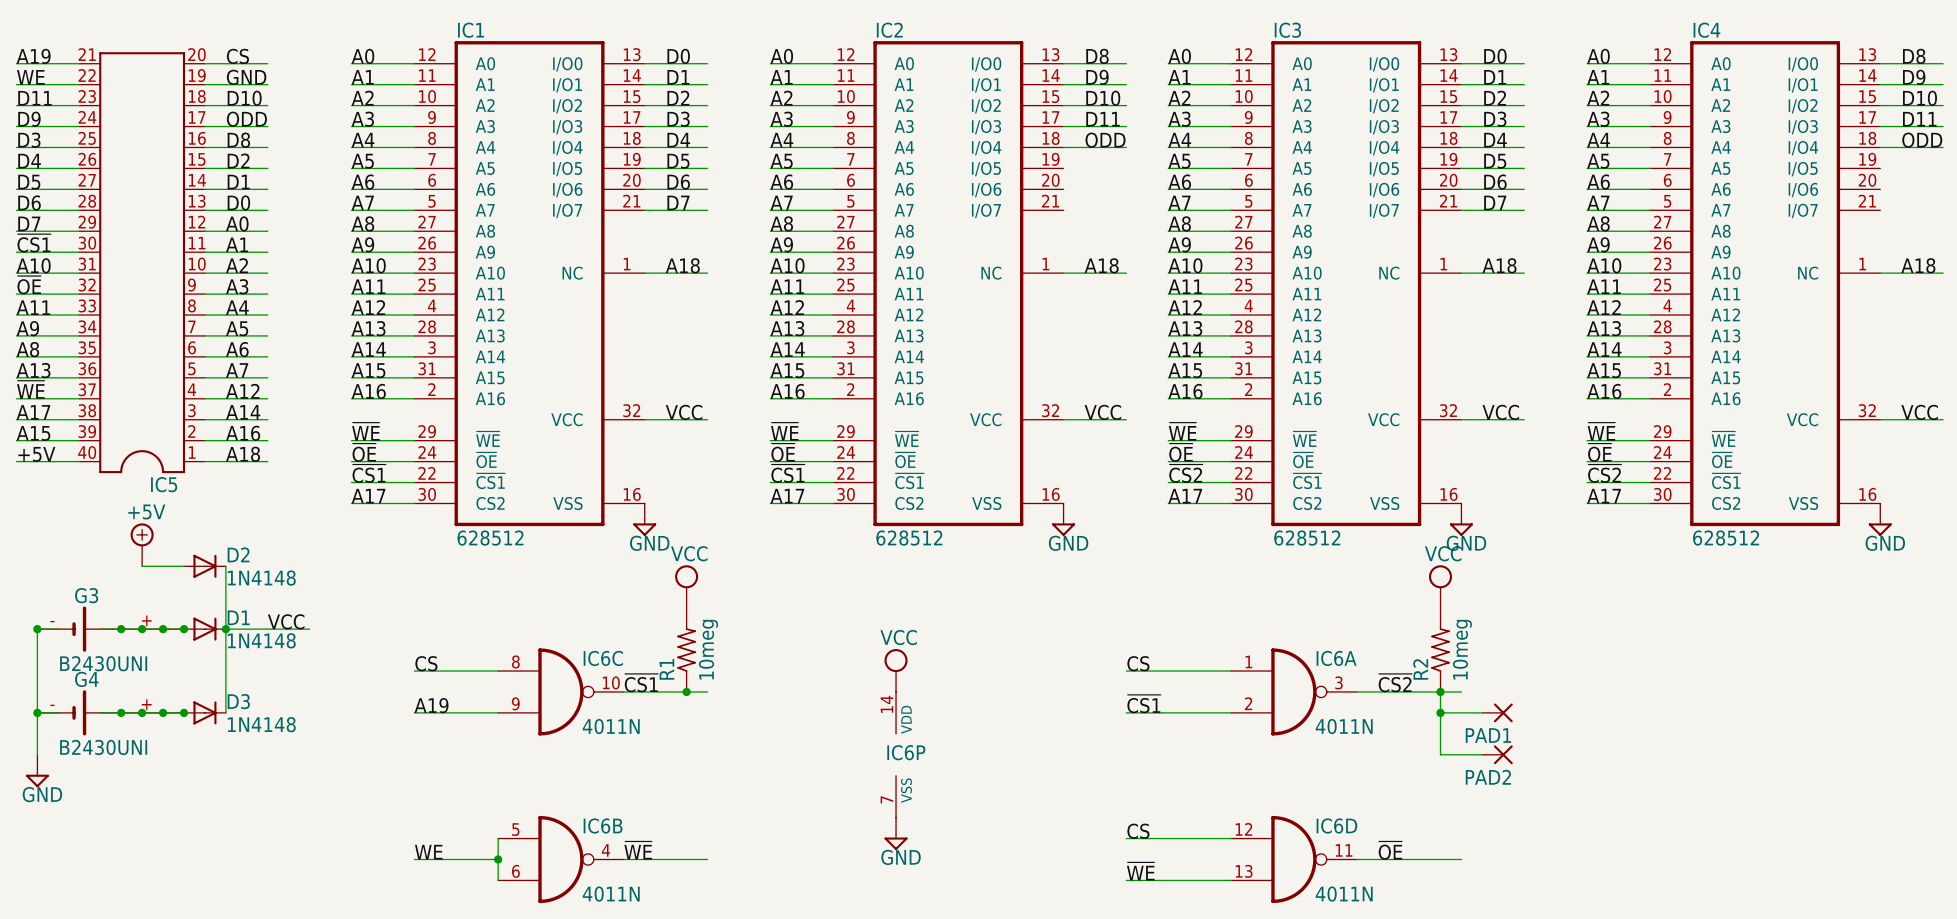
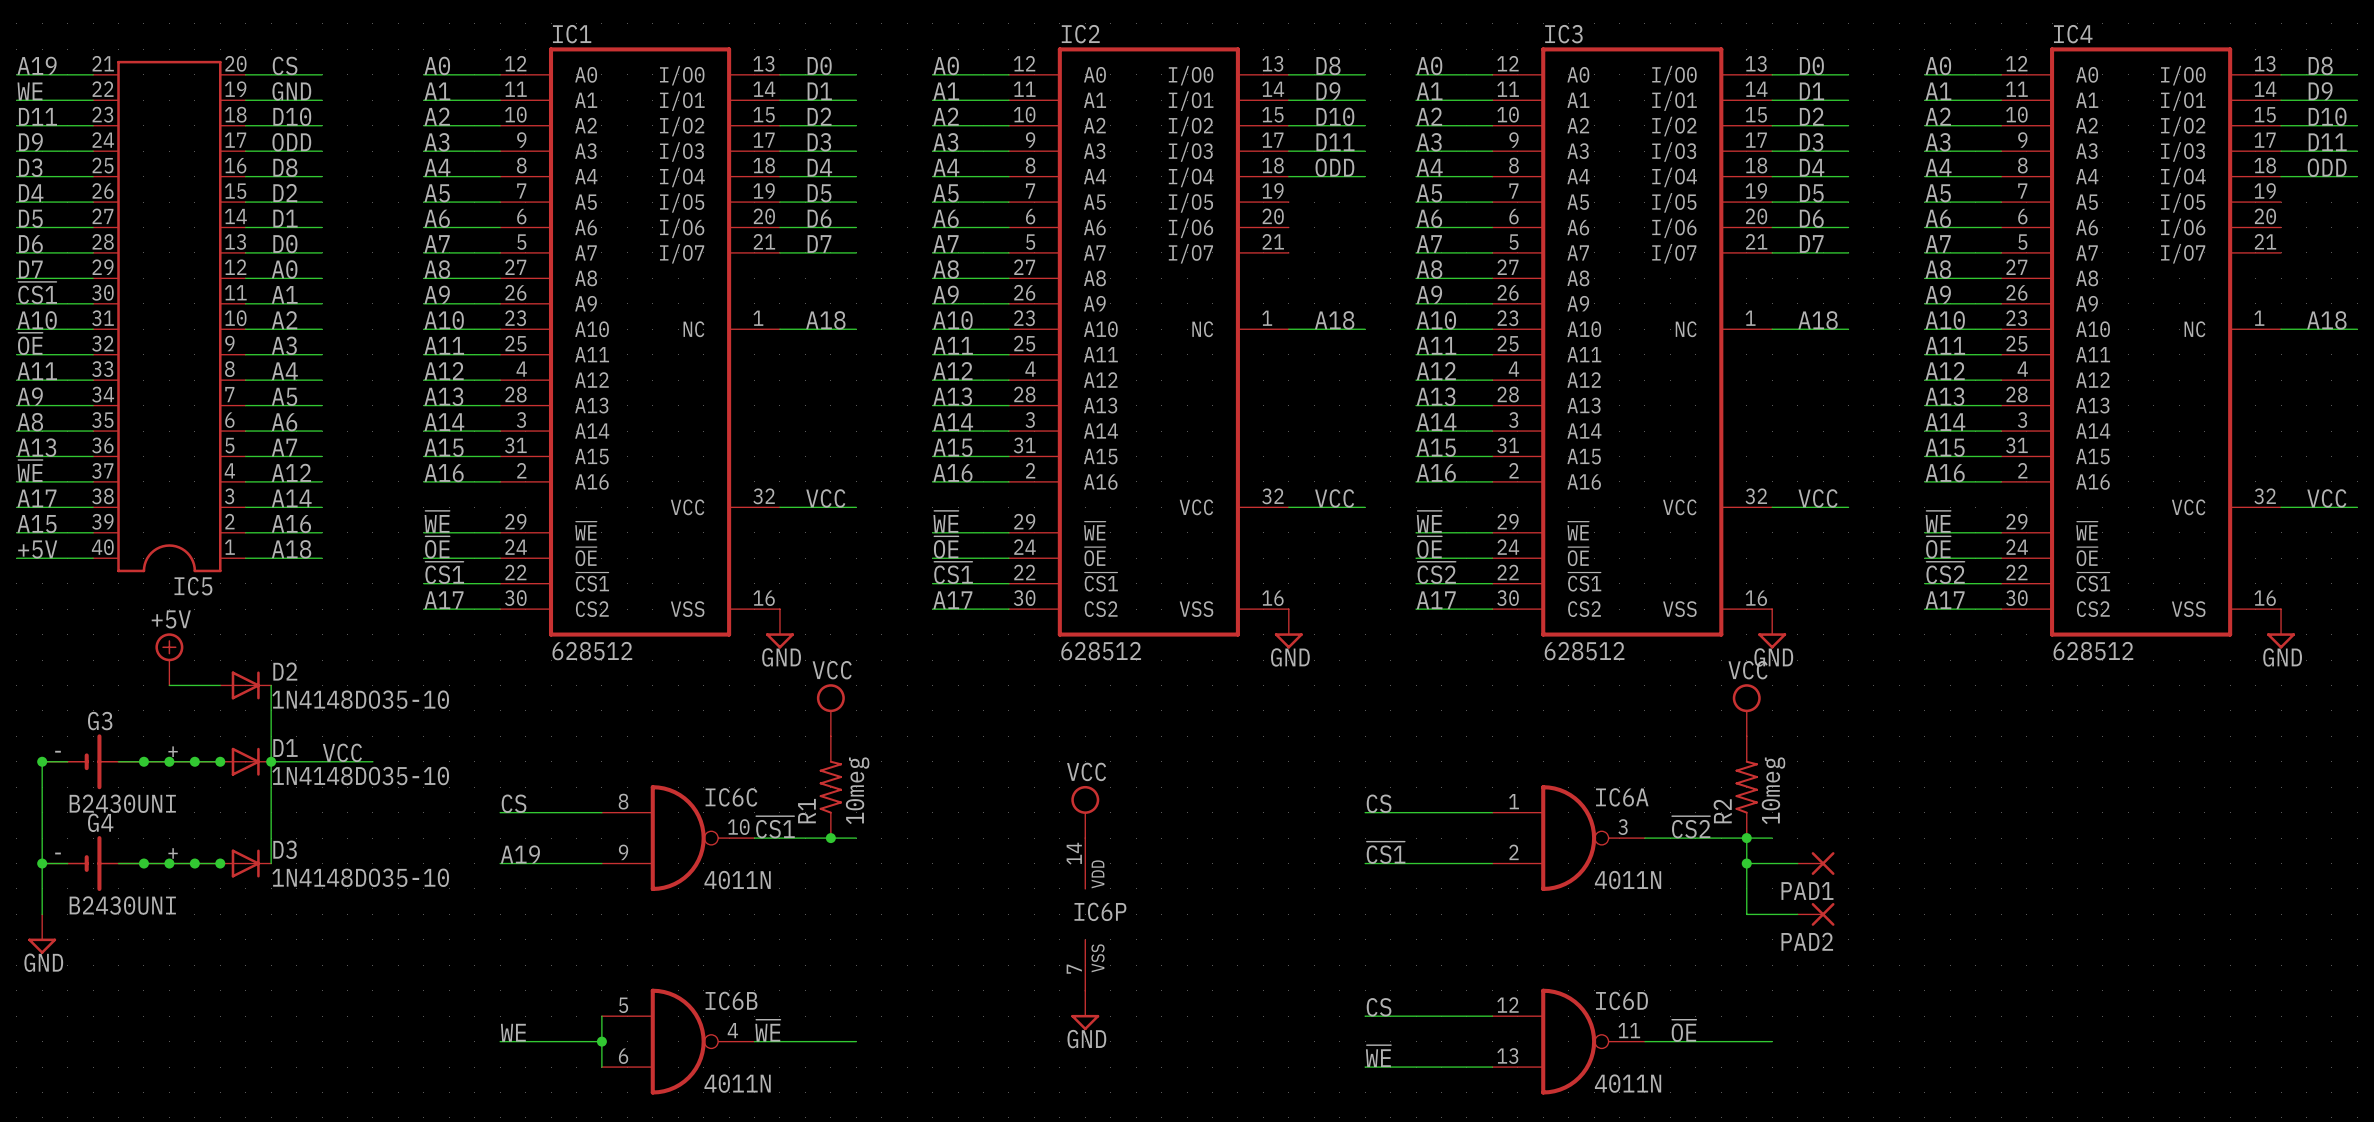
D2 value: 1N4148 (261, 578) -> 1N4148DO35-10 (360, 699)
D1 value: 1N4148 (261, 640) -> 1N4148DO35-10 (360, 776)
D3 value: 1N4148 (261, 724) -> 1N4148DO35-10 (360, 877)

